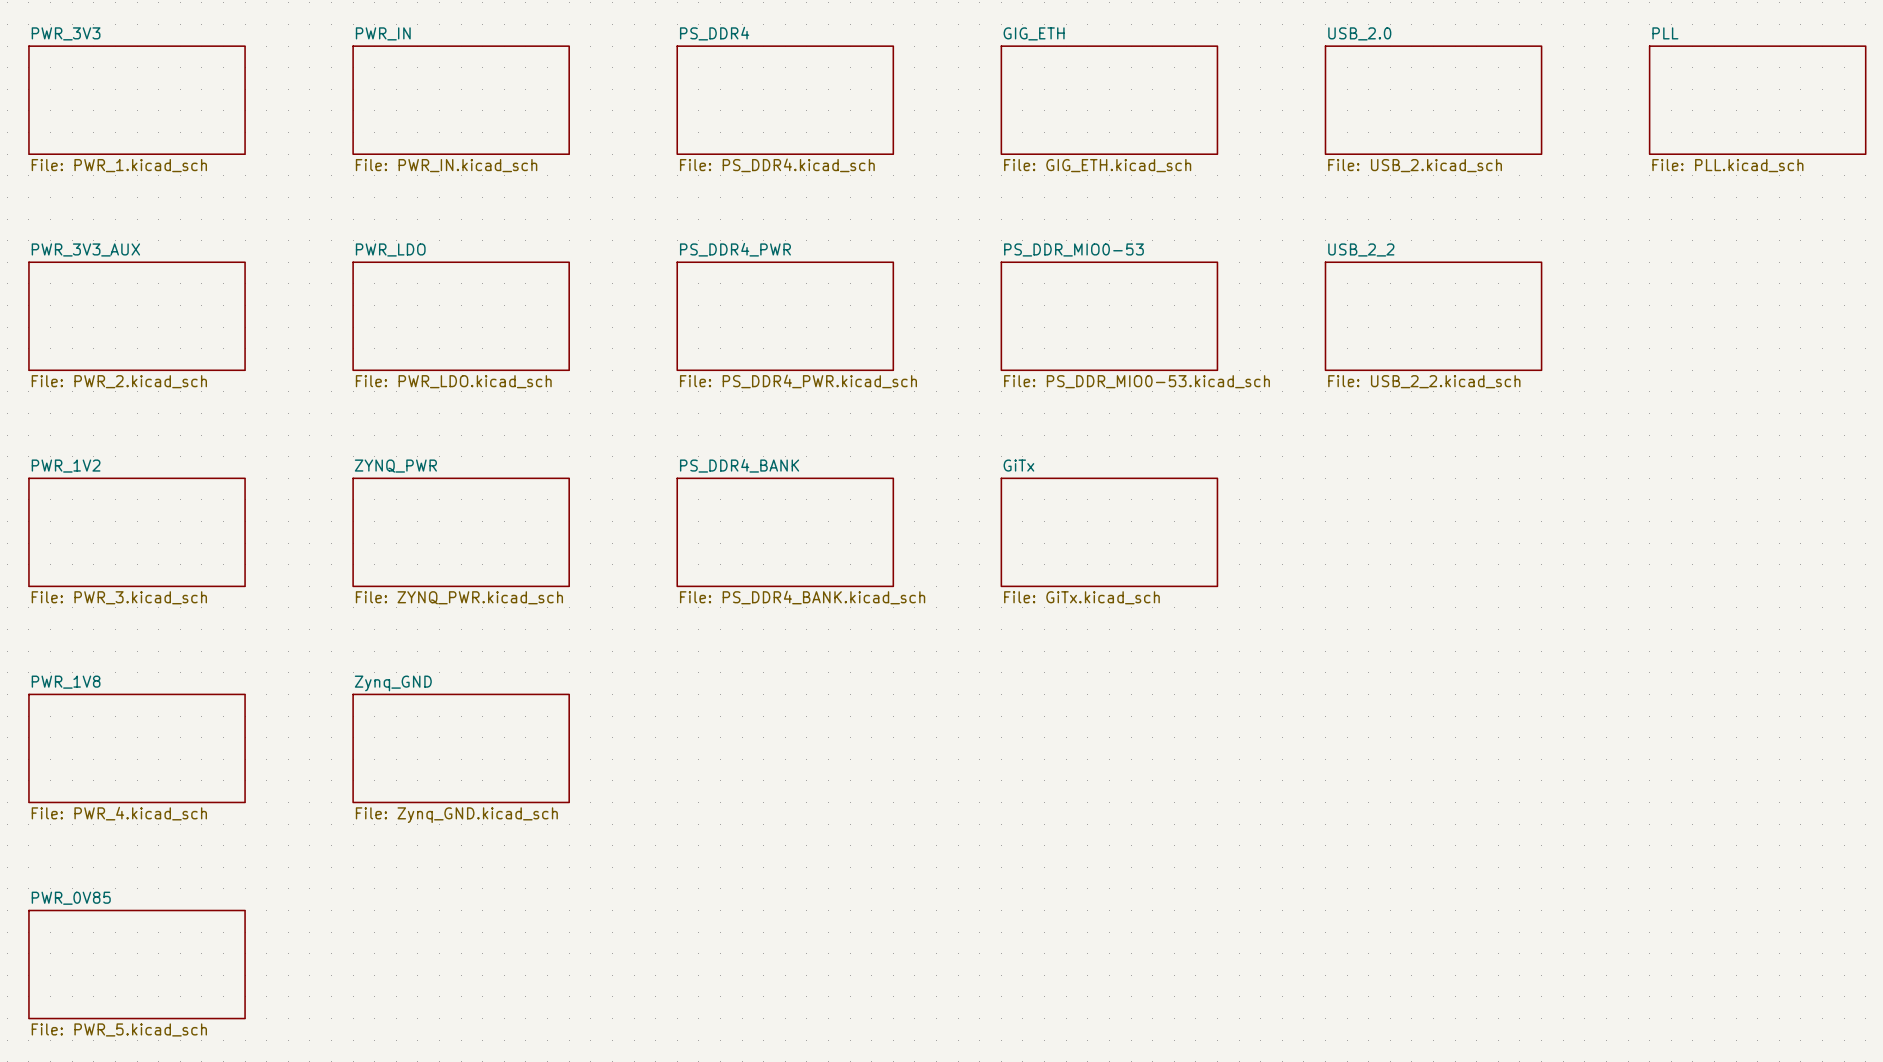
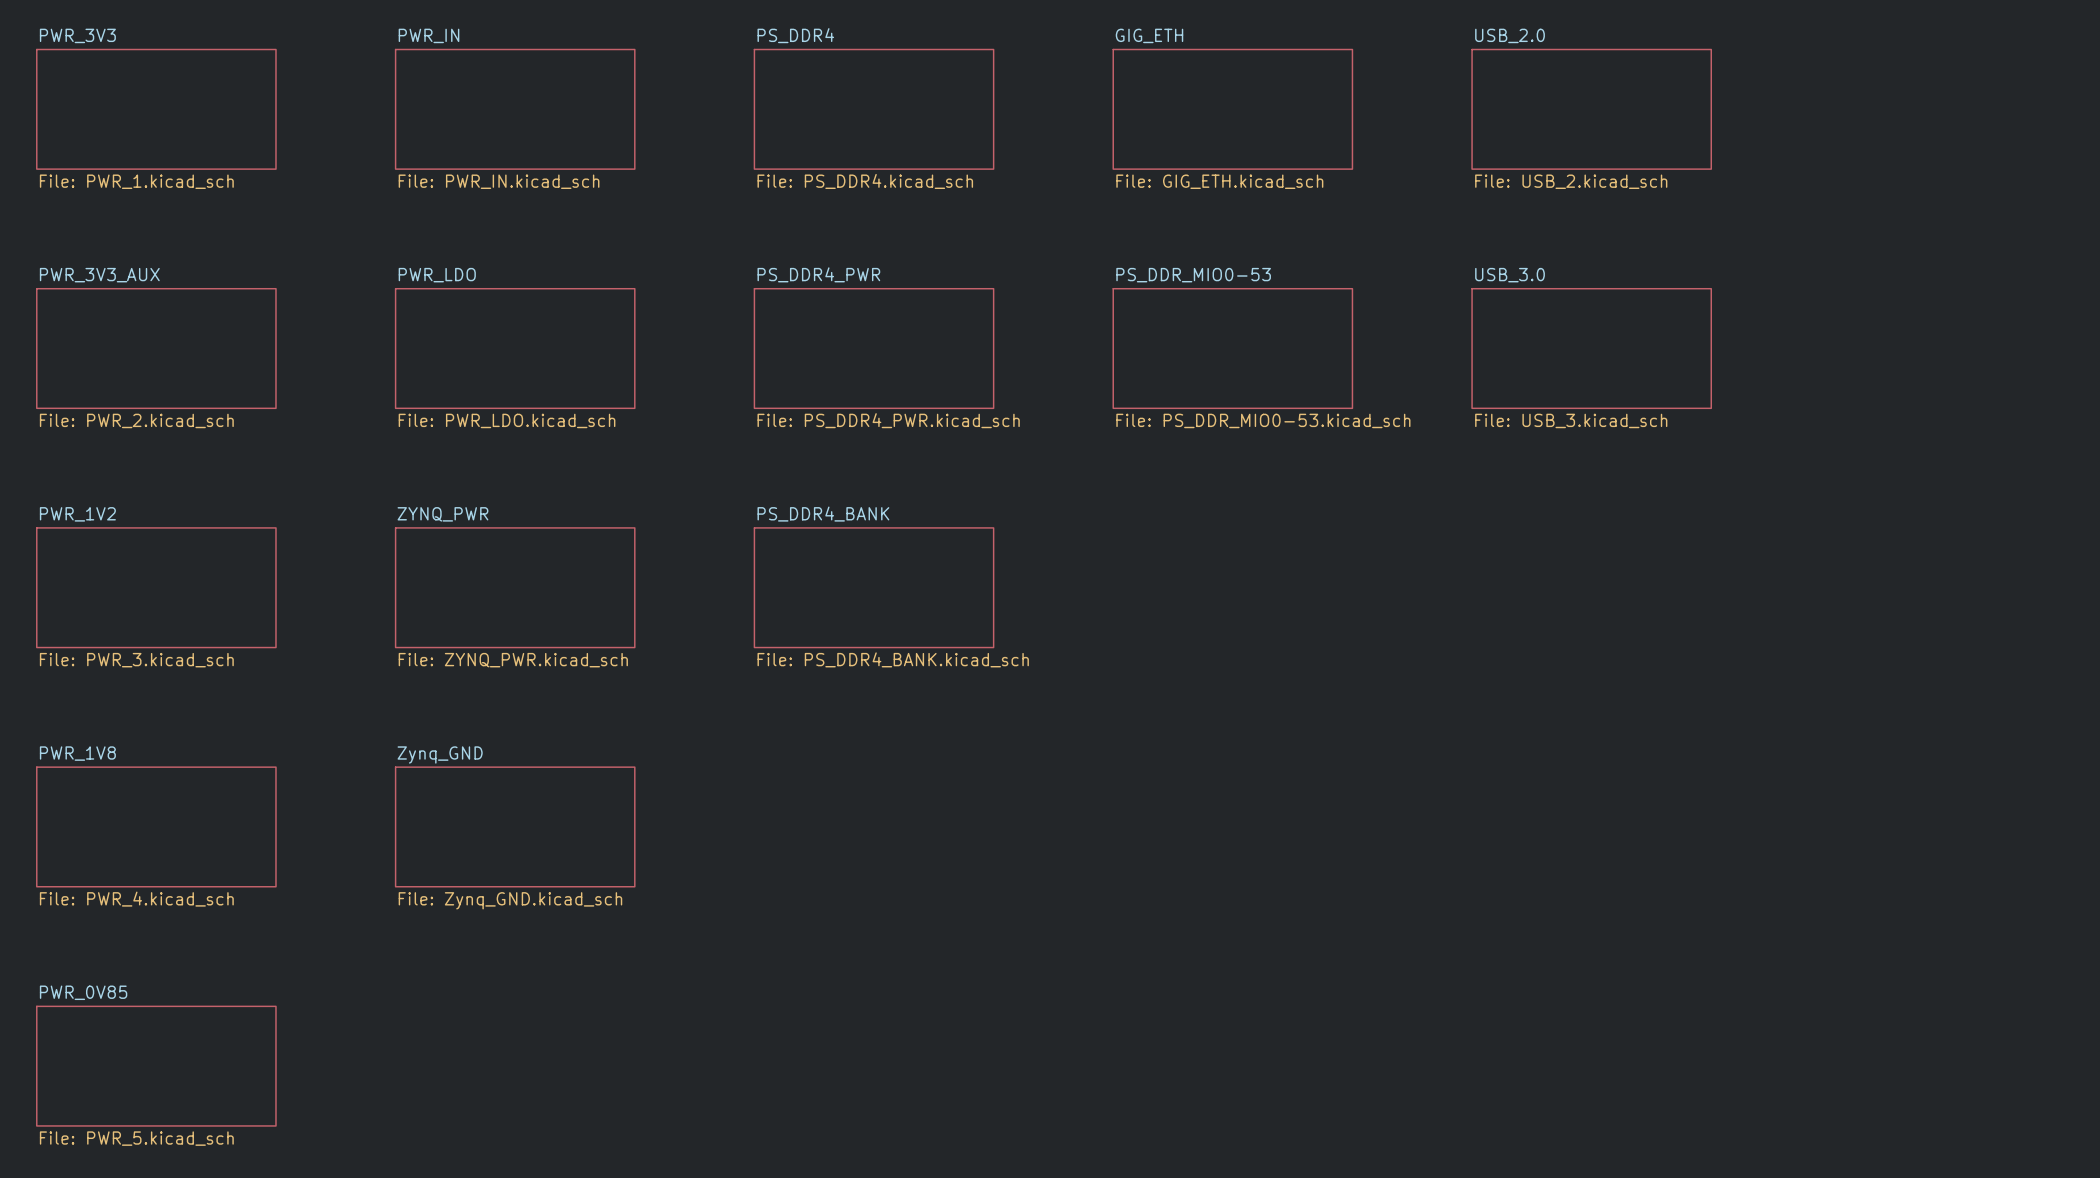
sheet PLL: File: PLL.kicad_sch (1757, 100) -> none
sheet USB_2_2 name: USB_2_2 (1361, 249) -> USB_3.0 (1510, 275)
sheet USB_2_2 value: File: USB_2_2.kicad_sch (1424, 381) -> File: USB_3.kicad_sch (1571, 420)
sheet GiTx: File: GiTx.kicad_sch (1109, 532) -> none

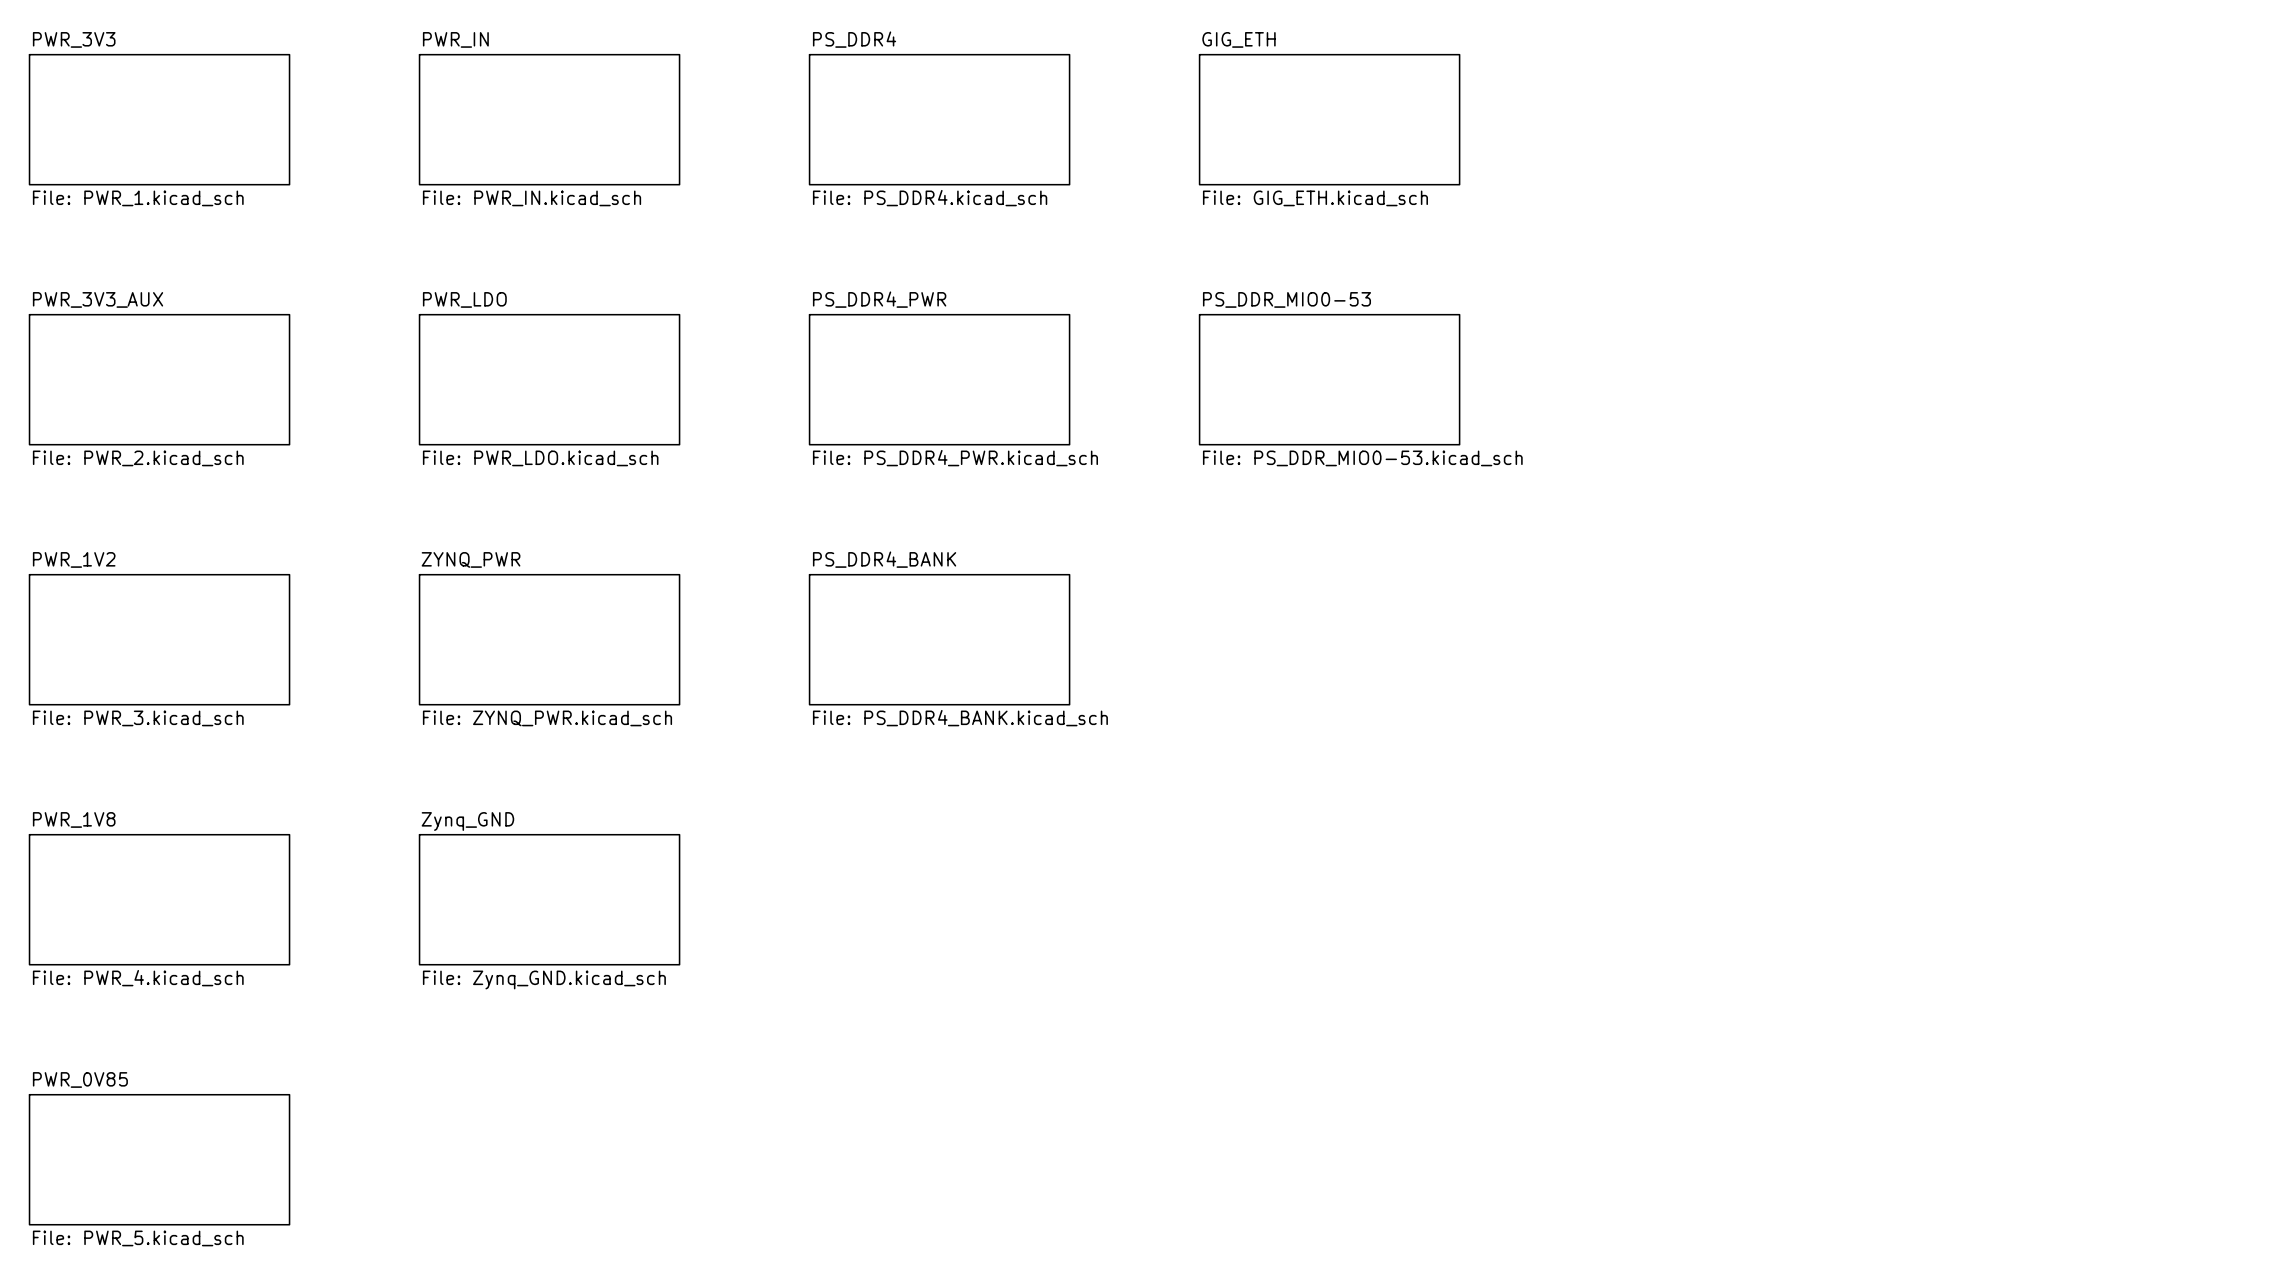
sheet USB_2.0: File: USB_2.kicad_sch (1591, 109) -> none
sheet USB_3.0: File: USB_3.kicad_sch (1591, 348) -> none

